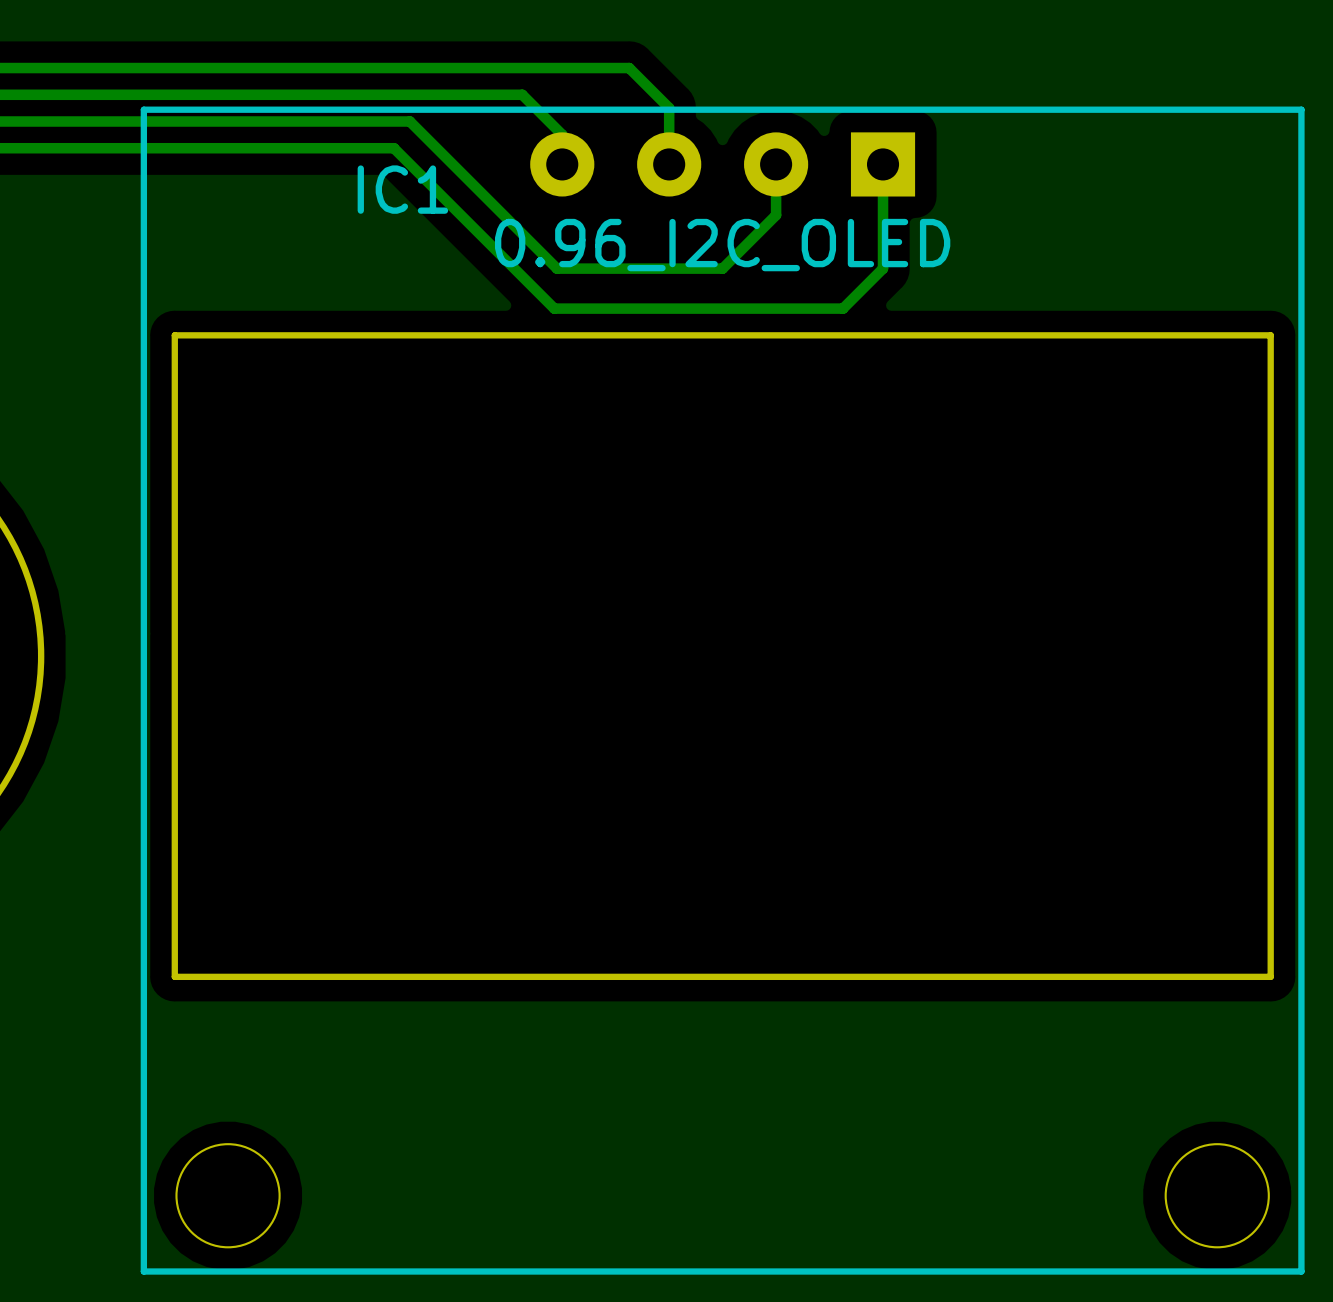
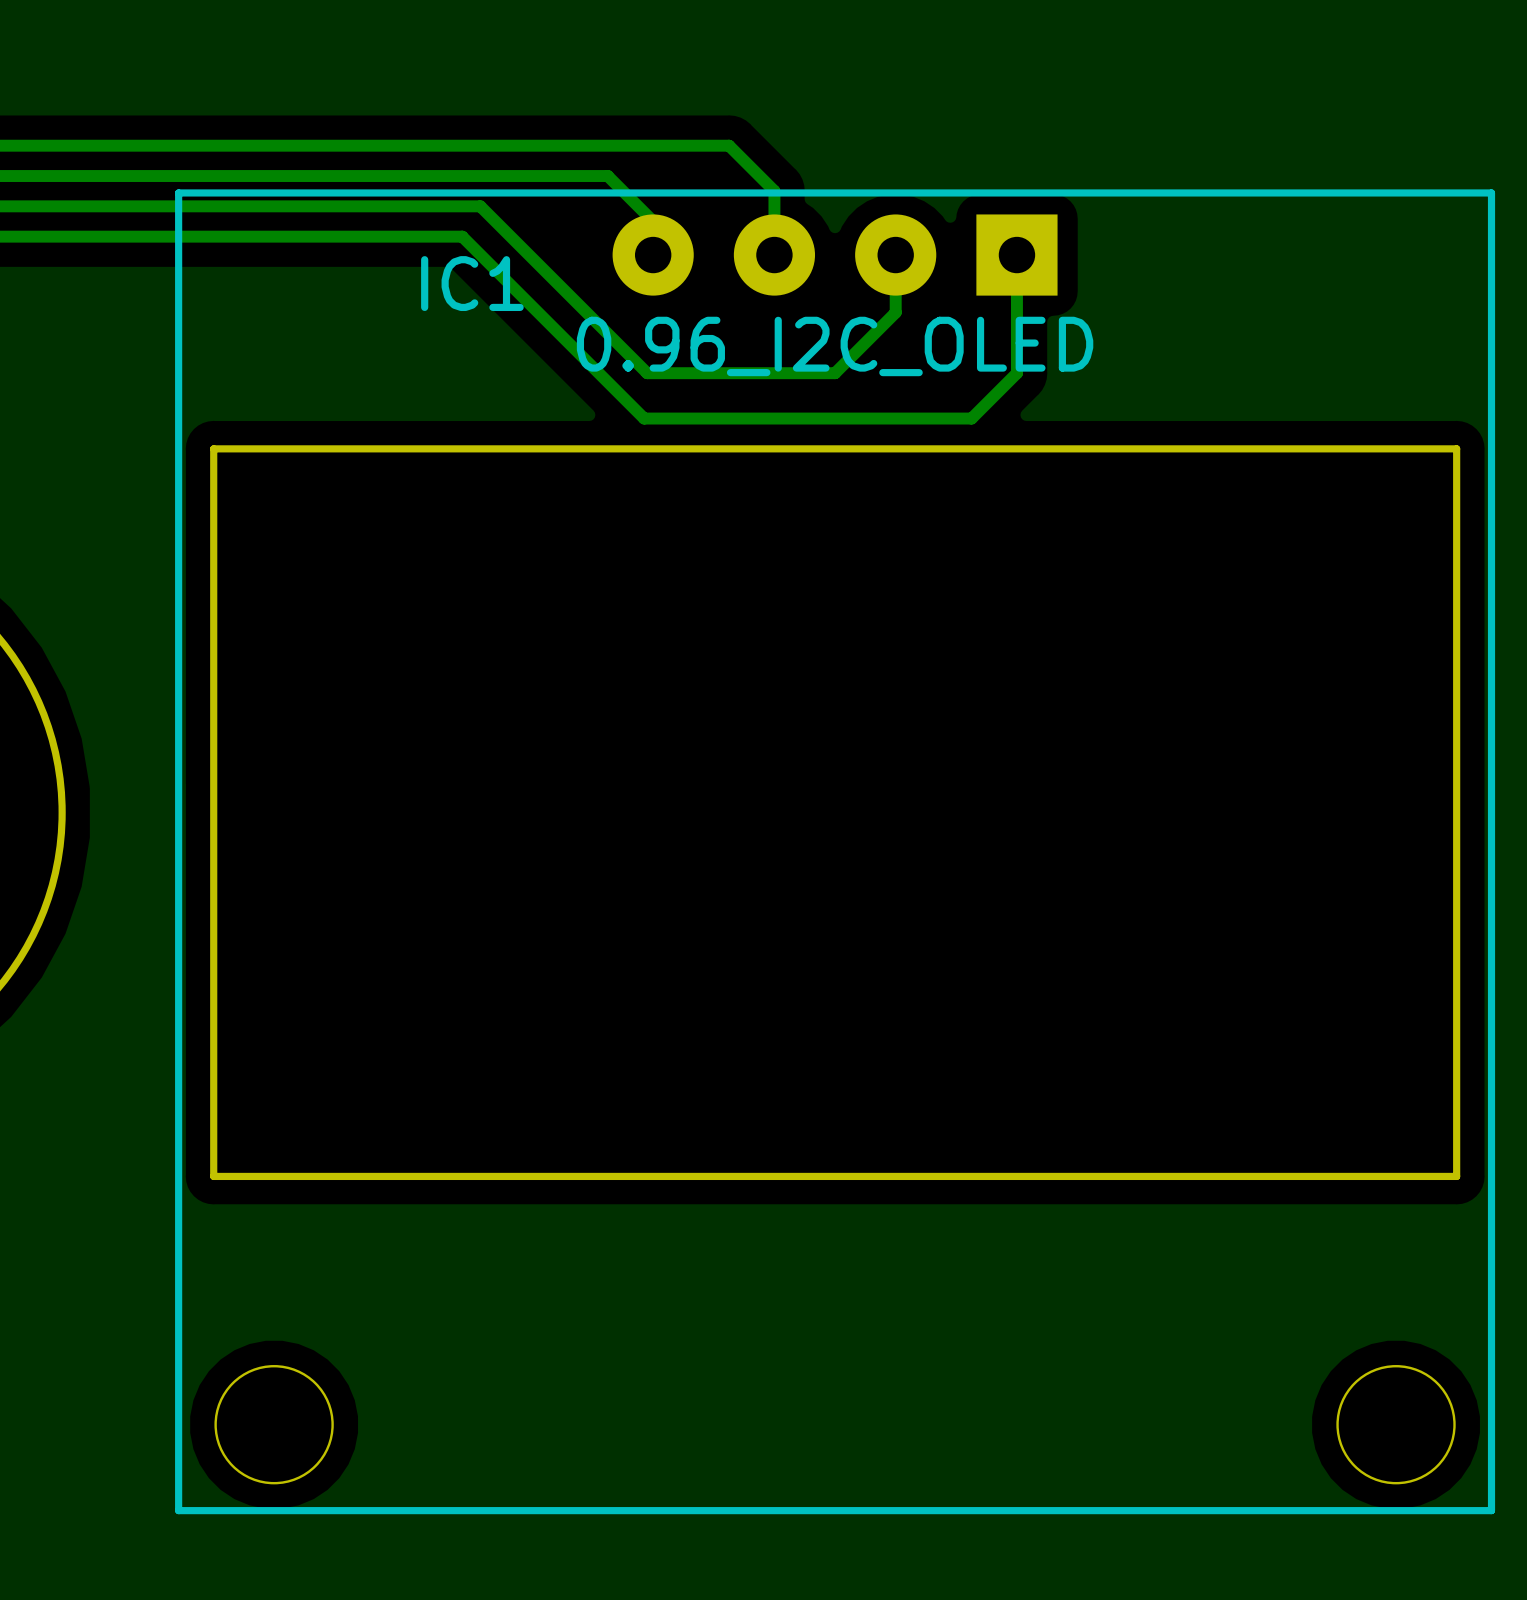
IC1 footprint: [140, 106, 1305, 1275] -> [175, 189, 1496, 1515]

